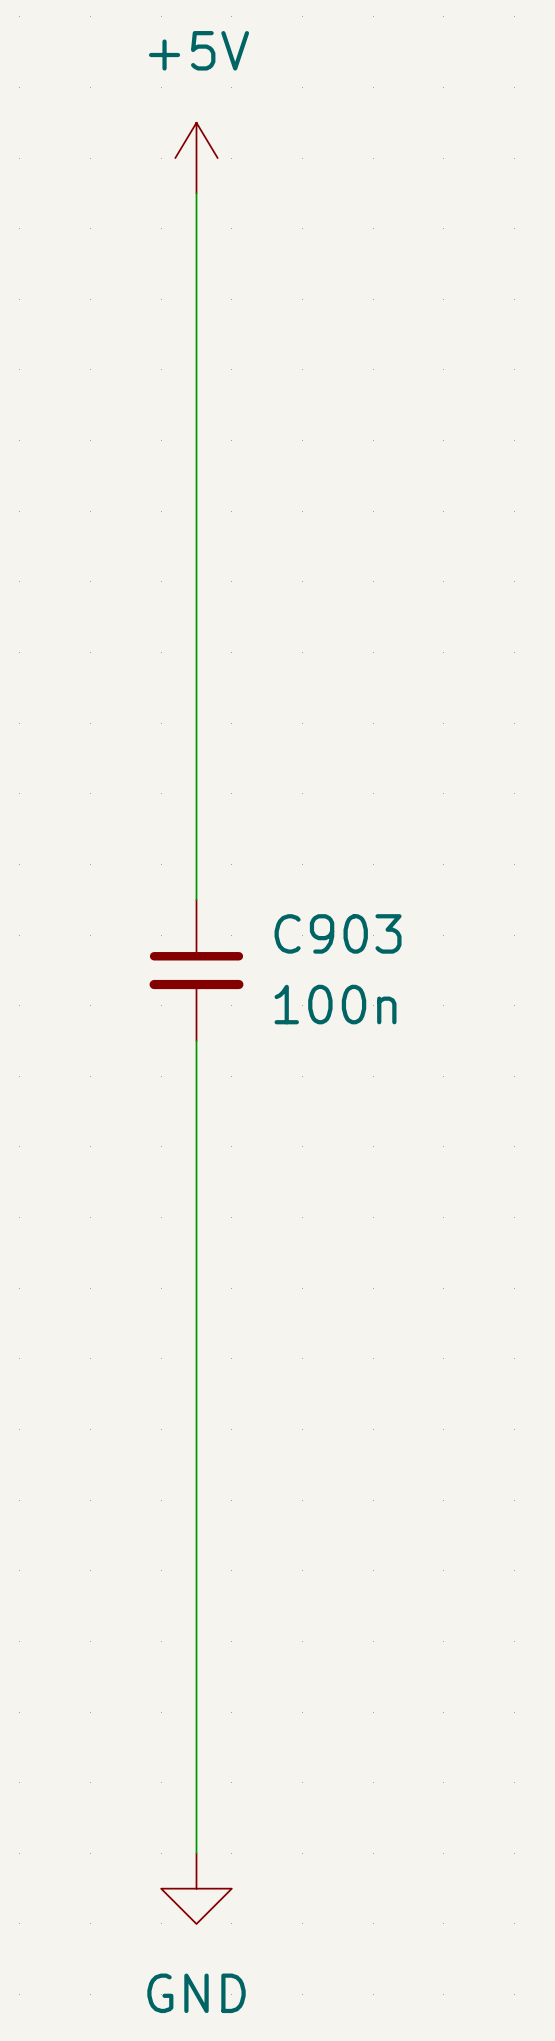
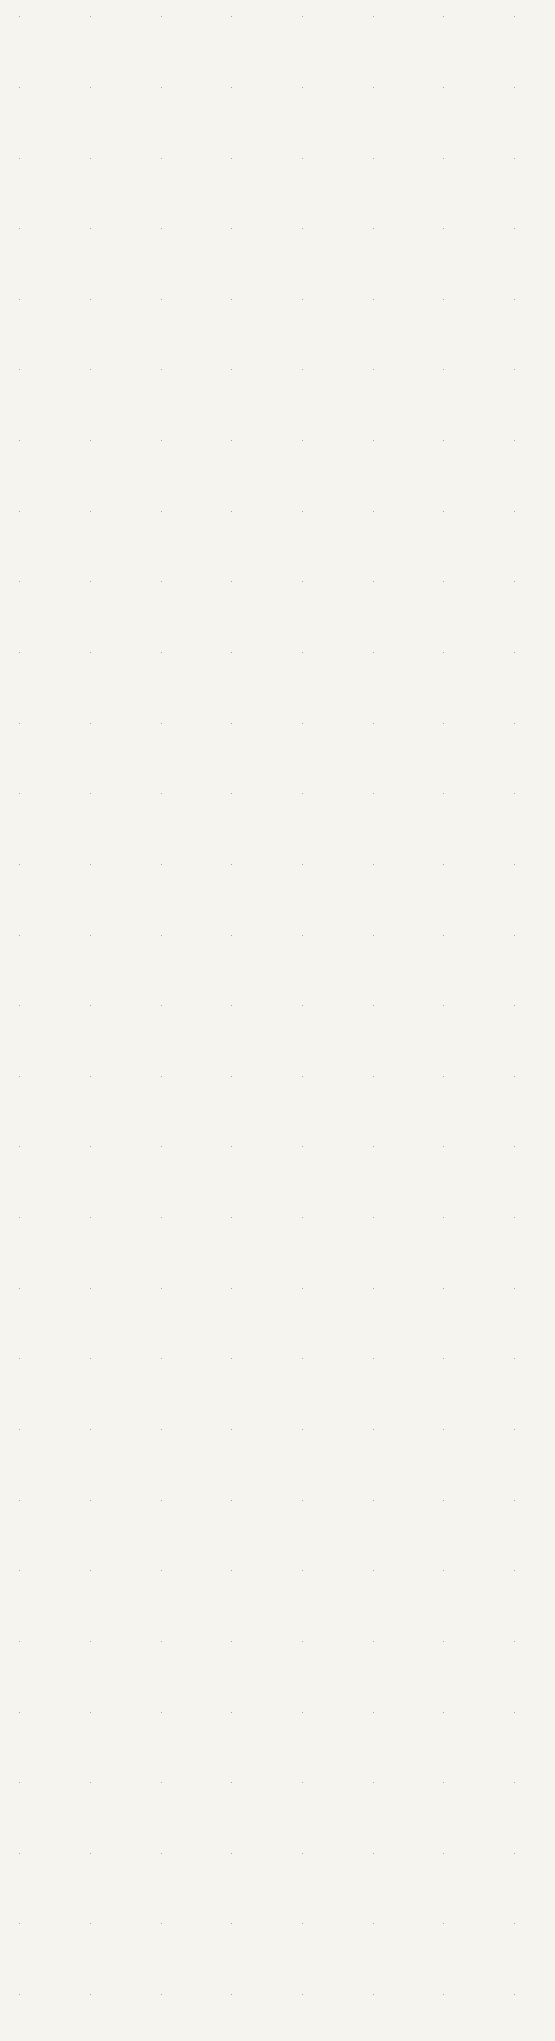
power symbol: +5V (196, 158) -> none
wire: (196, 193) (196, 899) -> none
C903: 100n (196, 970) -> none
wire: (196, 1041) (196, 1853) -> none
power symbol: GND (196, 1888) -> none

